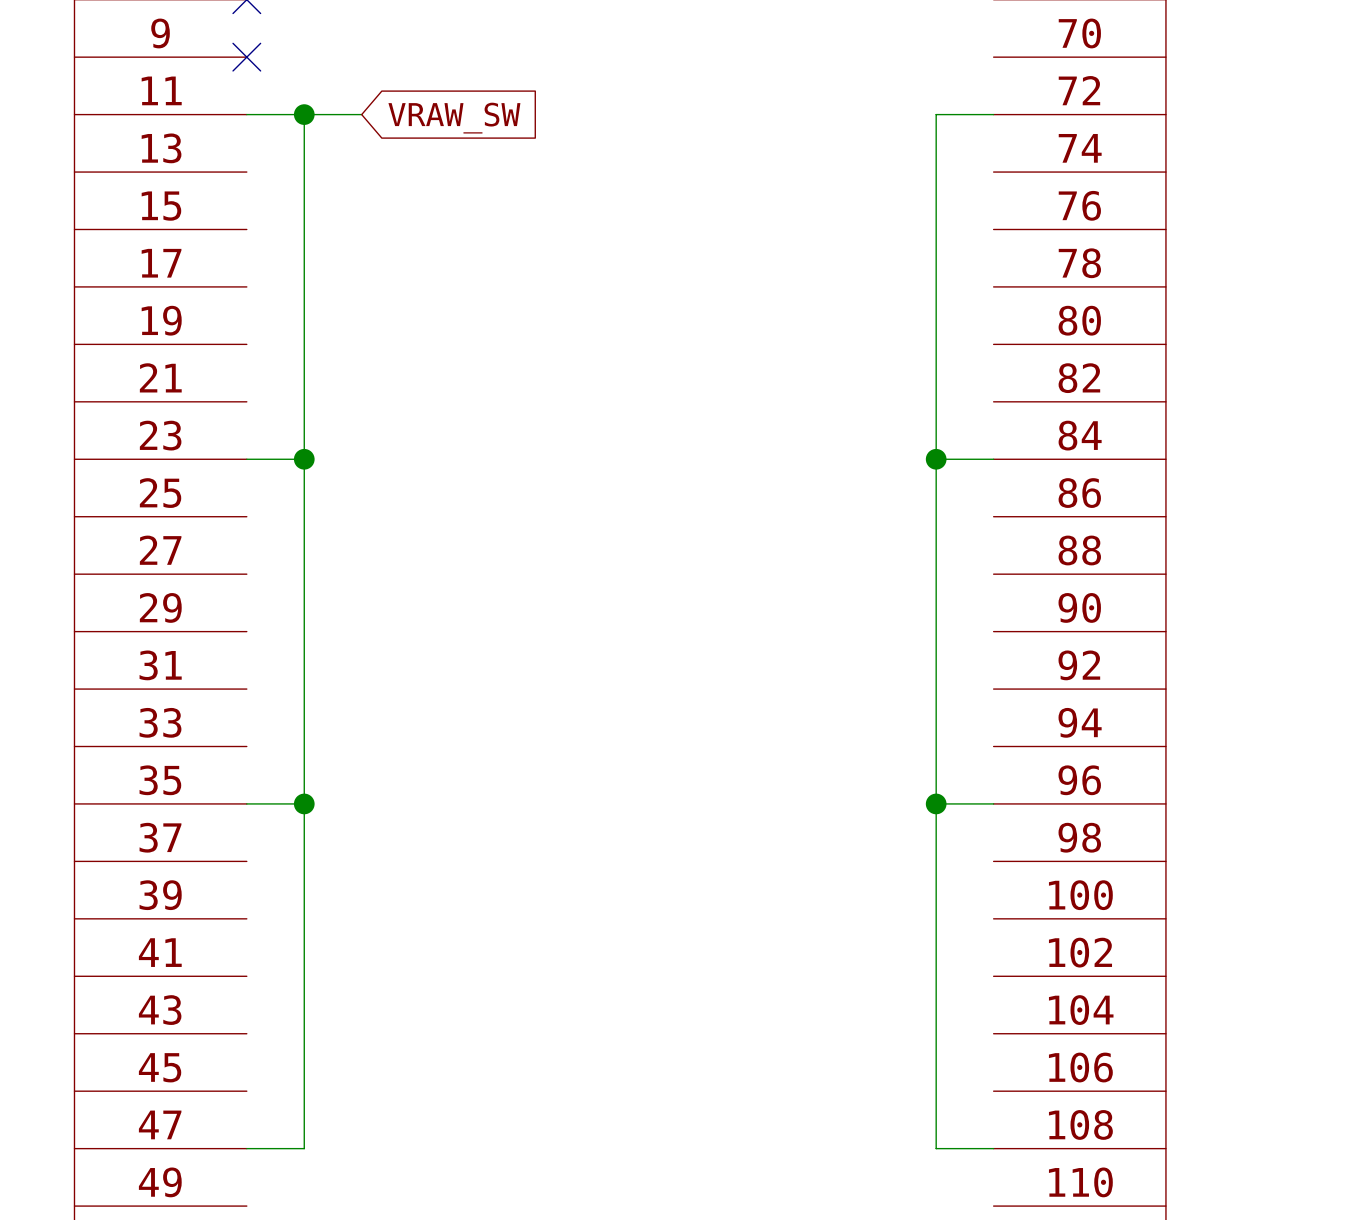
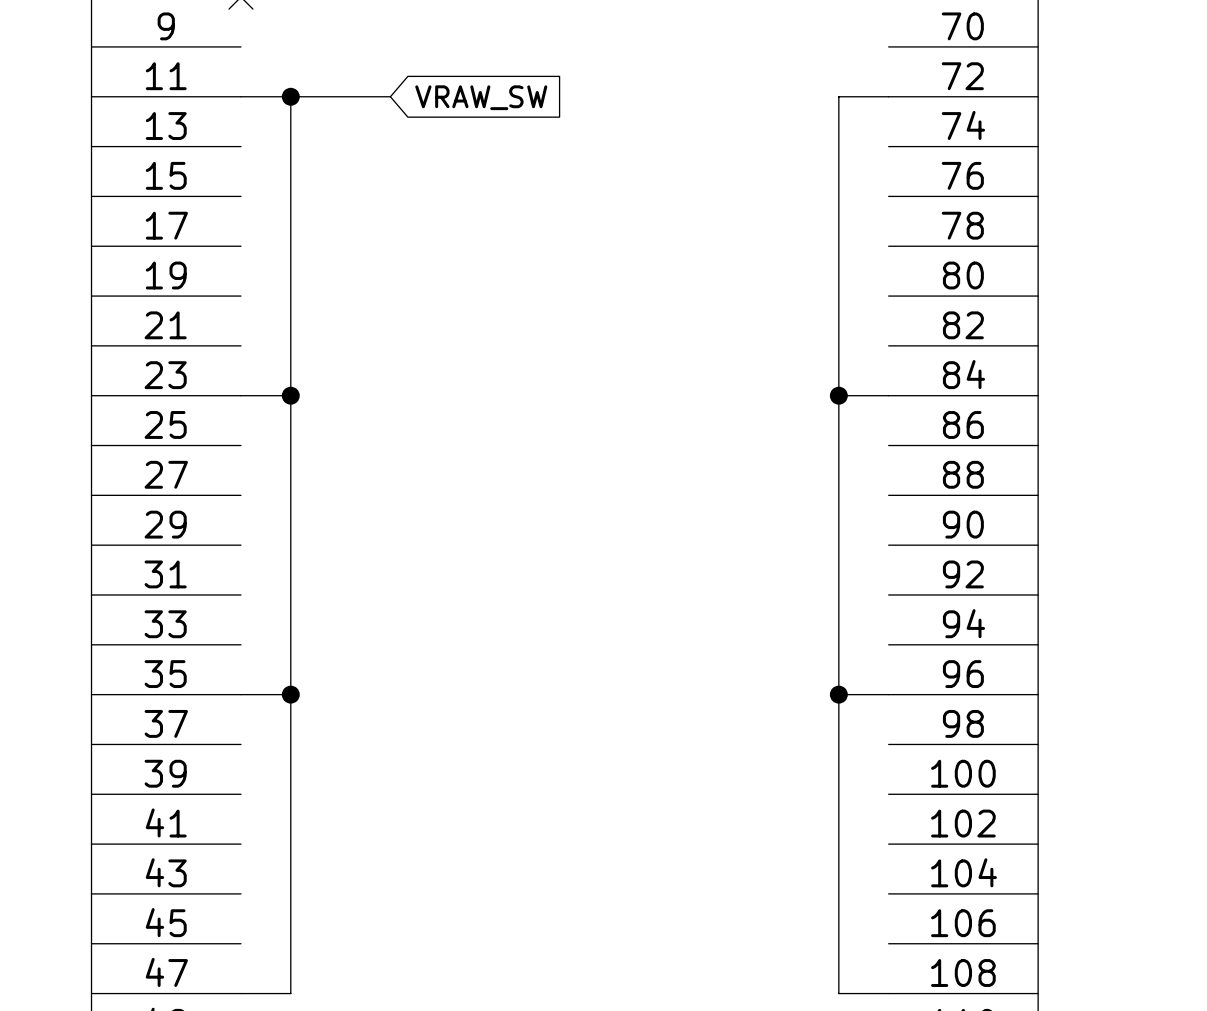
no-connect mark: (246, 57) -> none
wire: none -> (340, 96) (390, 96)
global label position: VRAW_SW (454, 118) -> VRAW_SW (481, 97)

